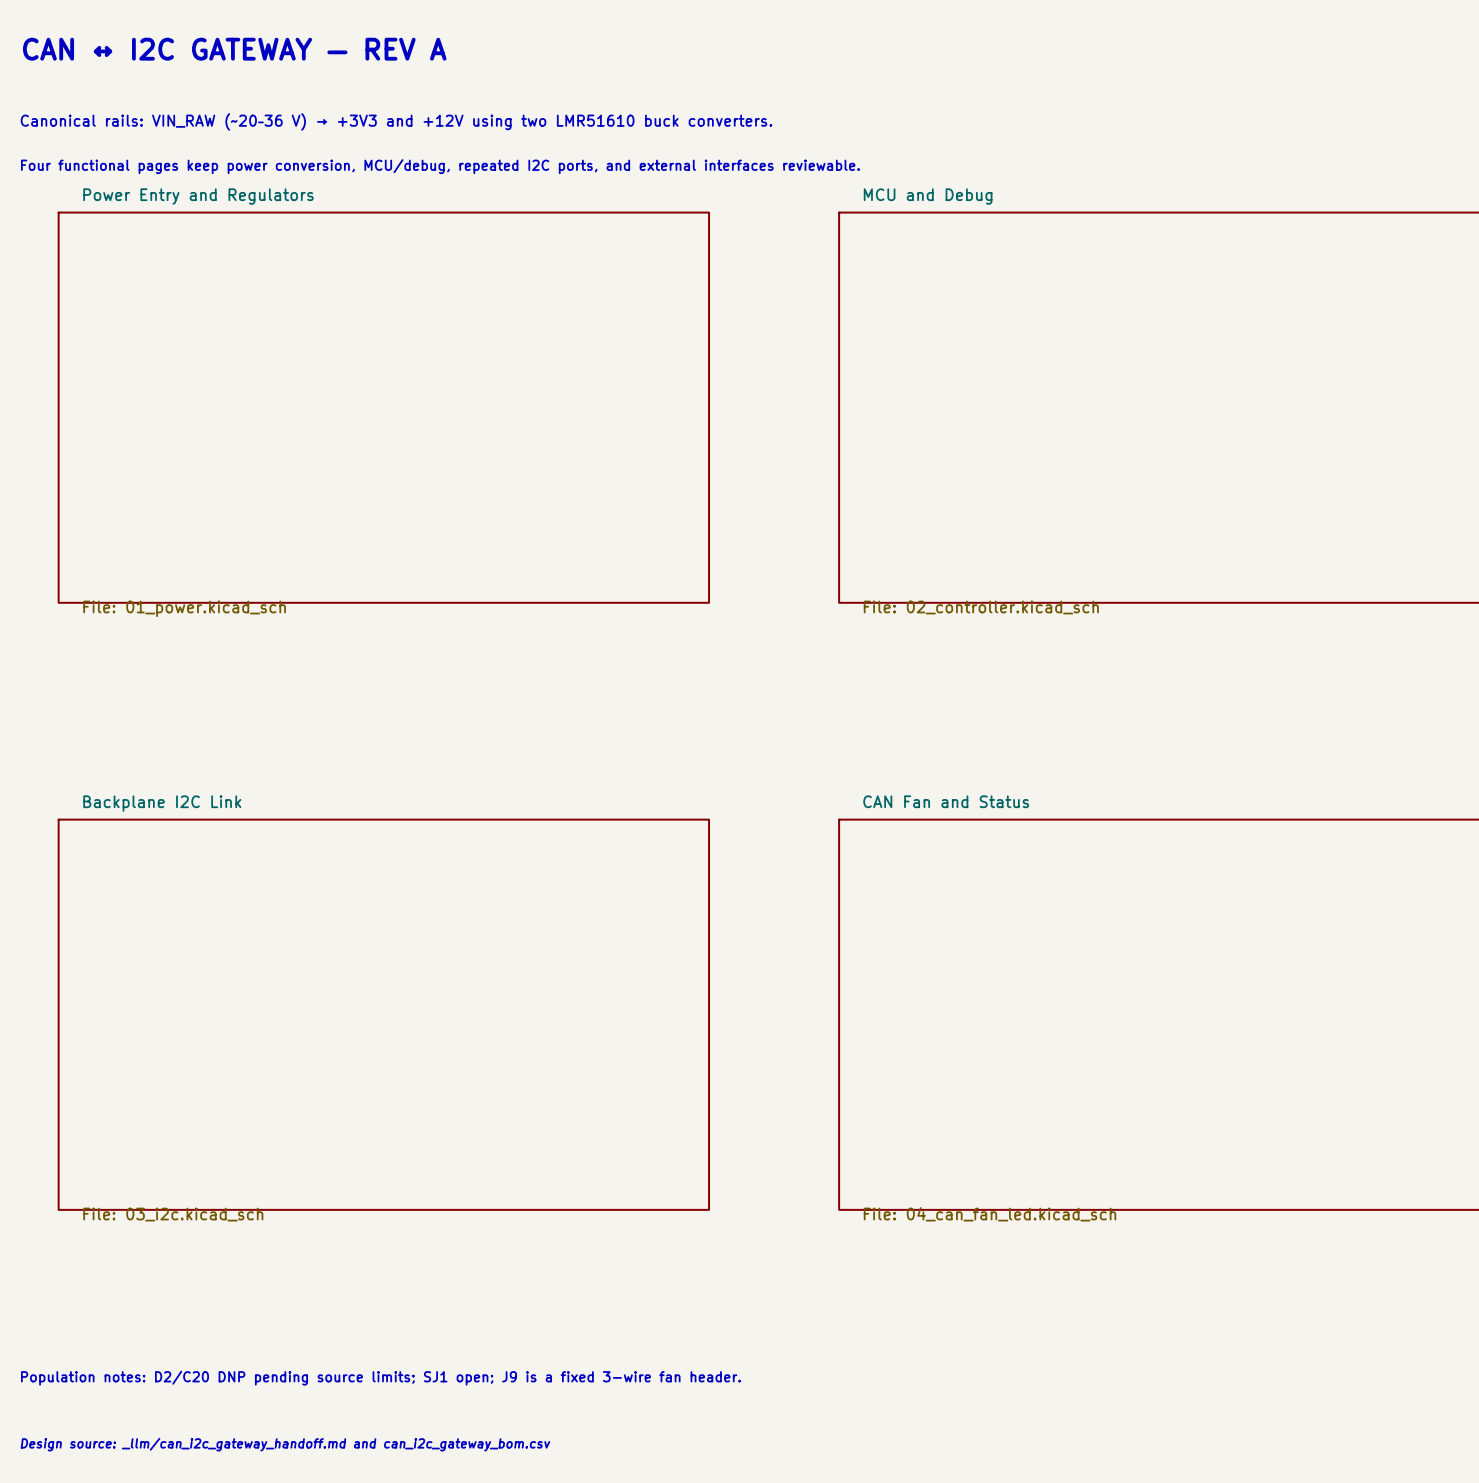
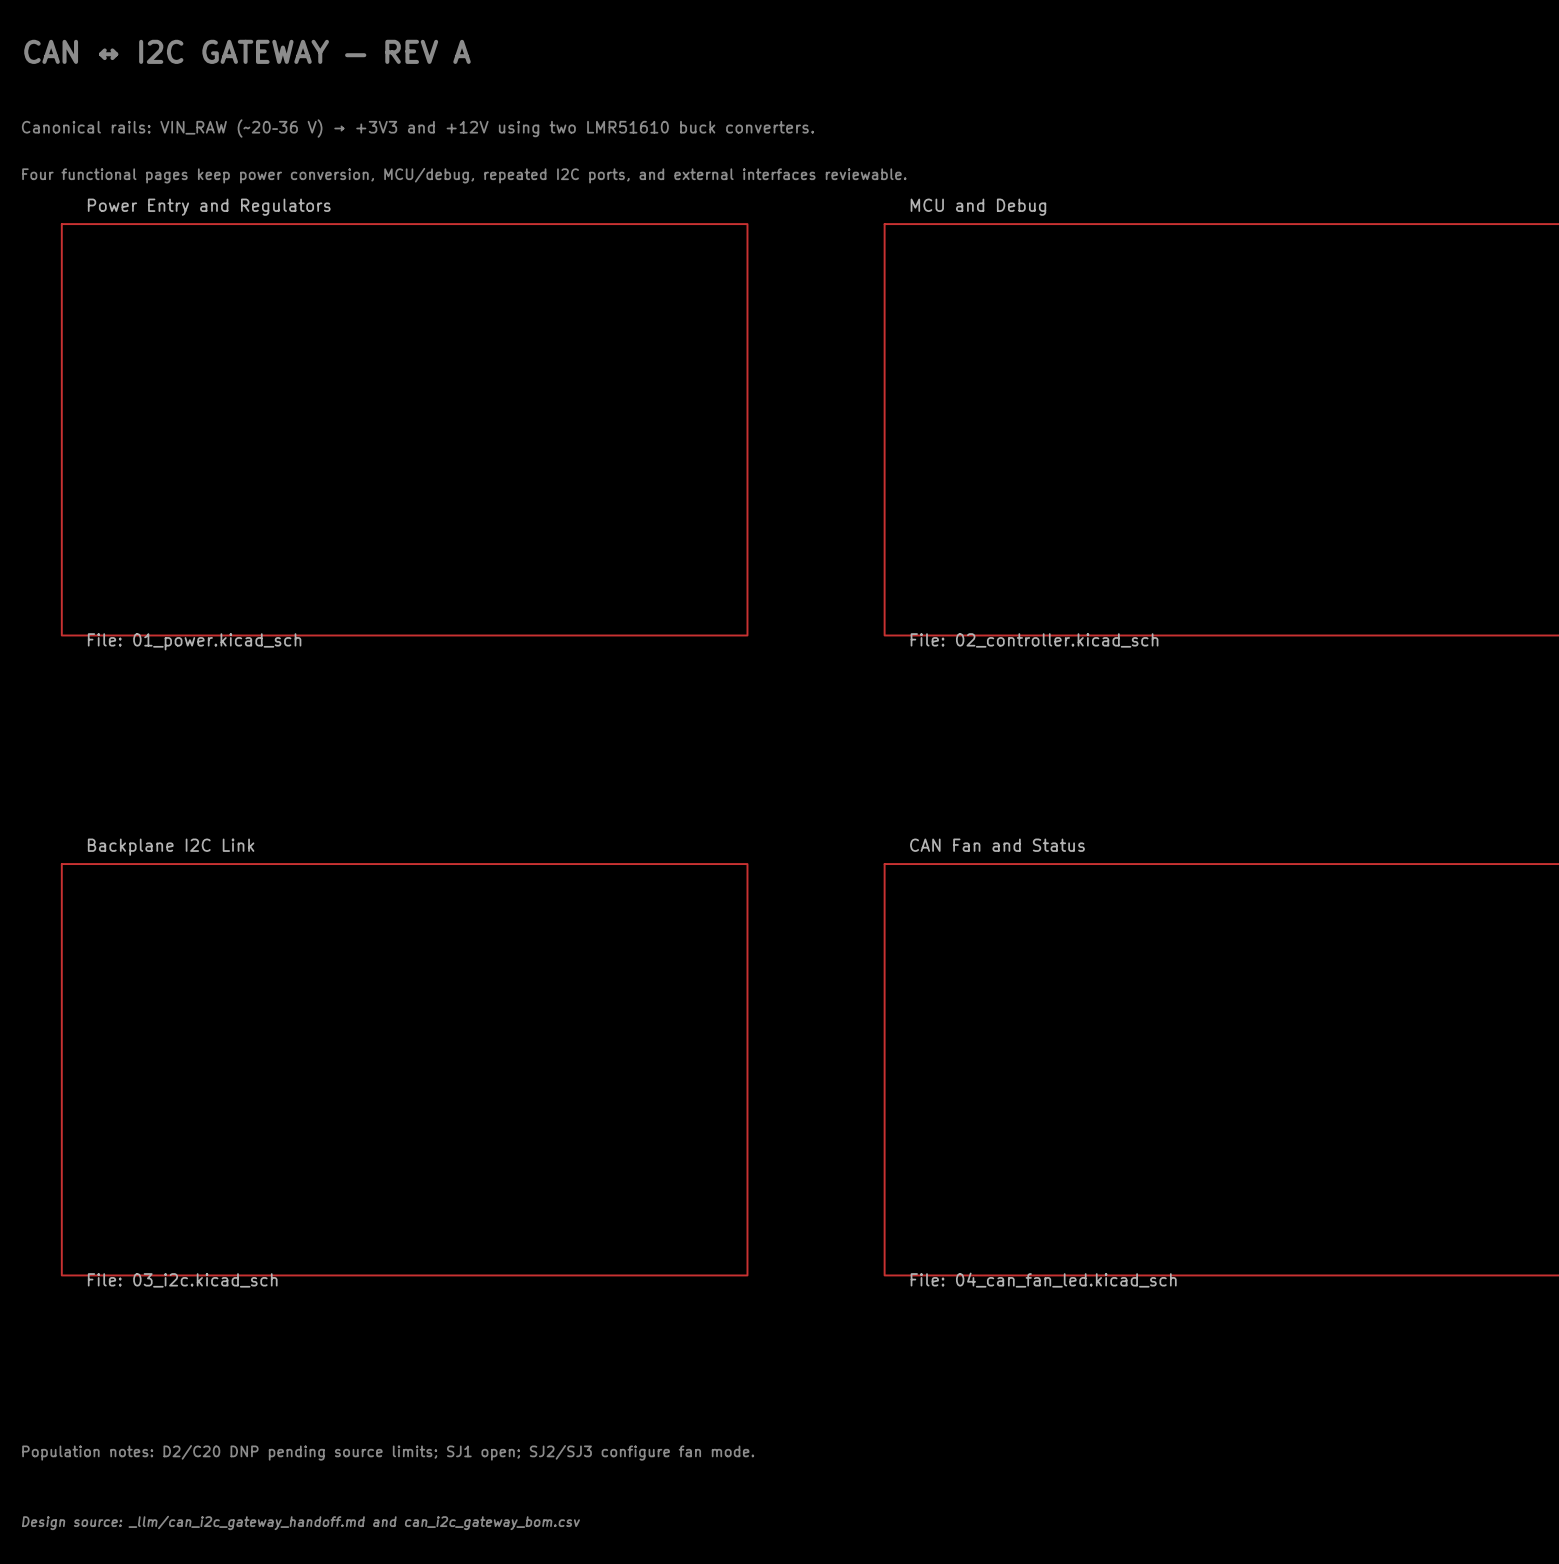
text: Population notes: D2/C20 DNP pending source limits; SJ1 open; J9 is a fixed 3-wire fan header. (380, 1378) -> Population notes: D2/C20 DNP pending source limits; SJ1 open; SJ2/SJ3 configure fan mode. (388, 1452)

